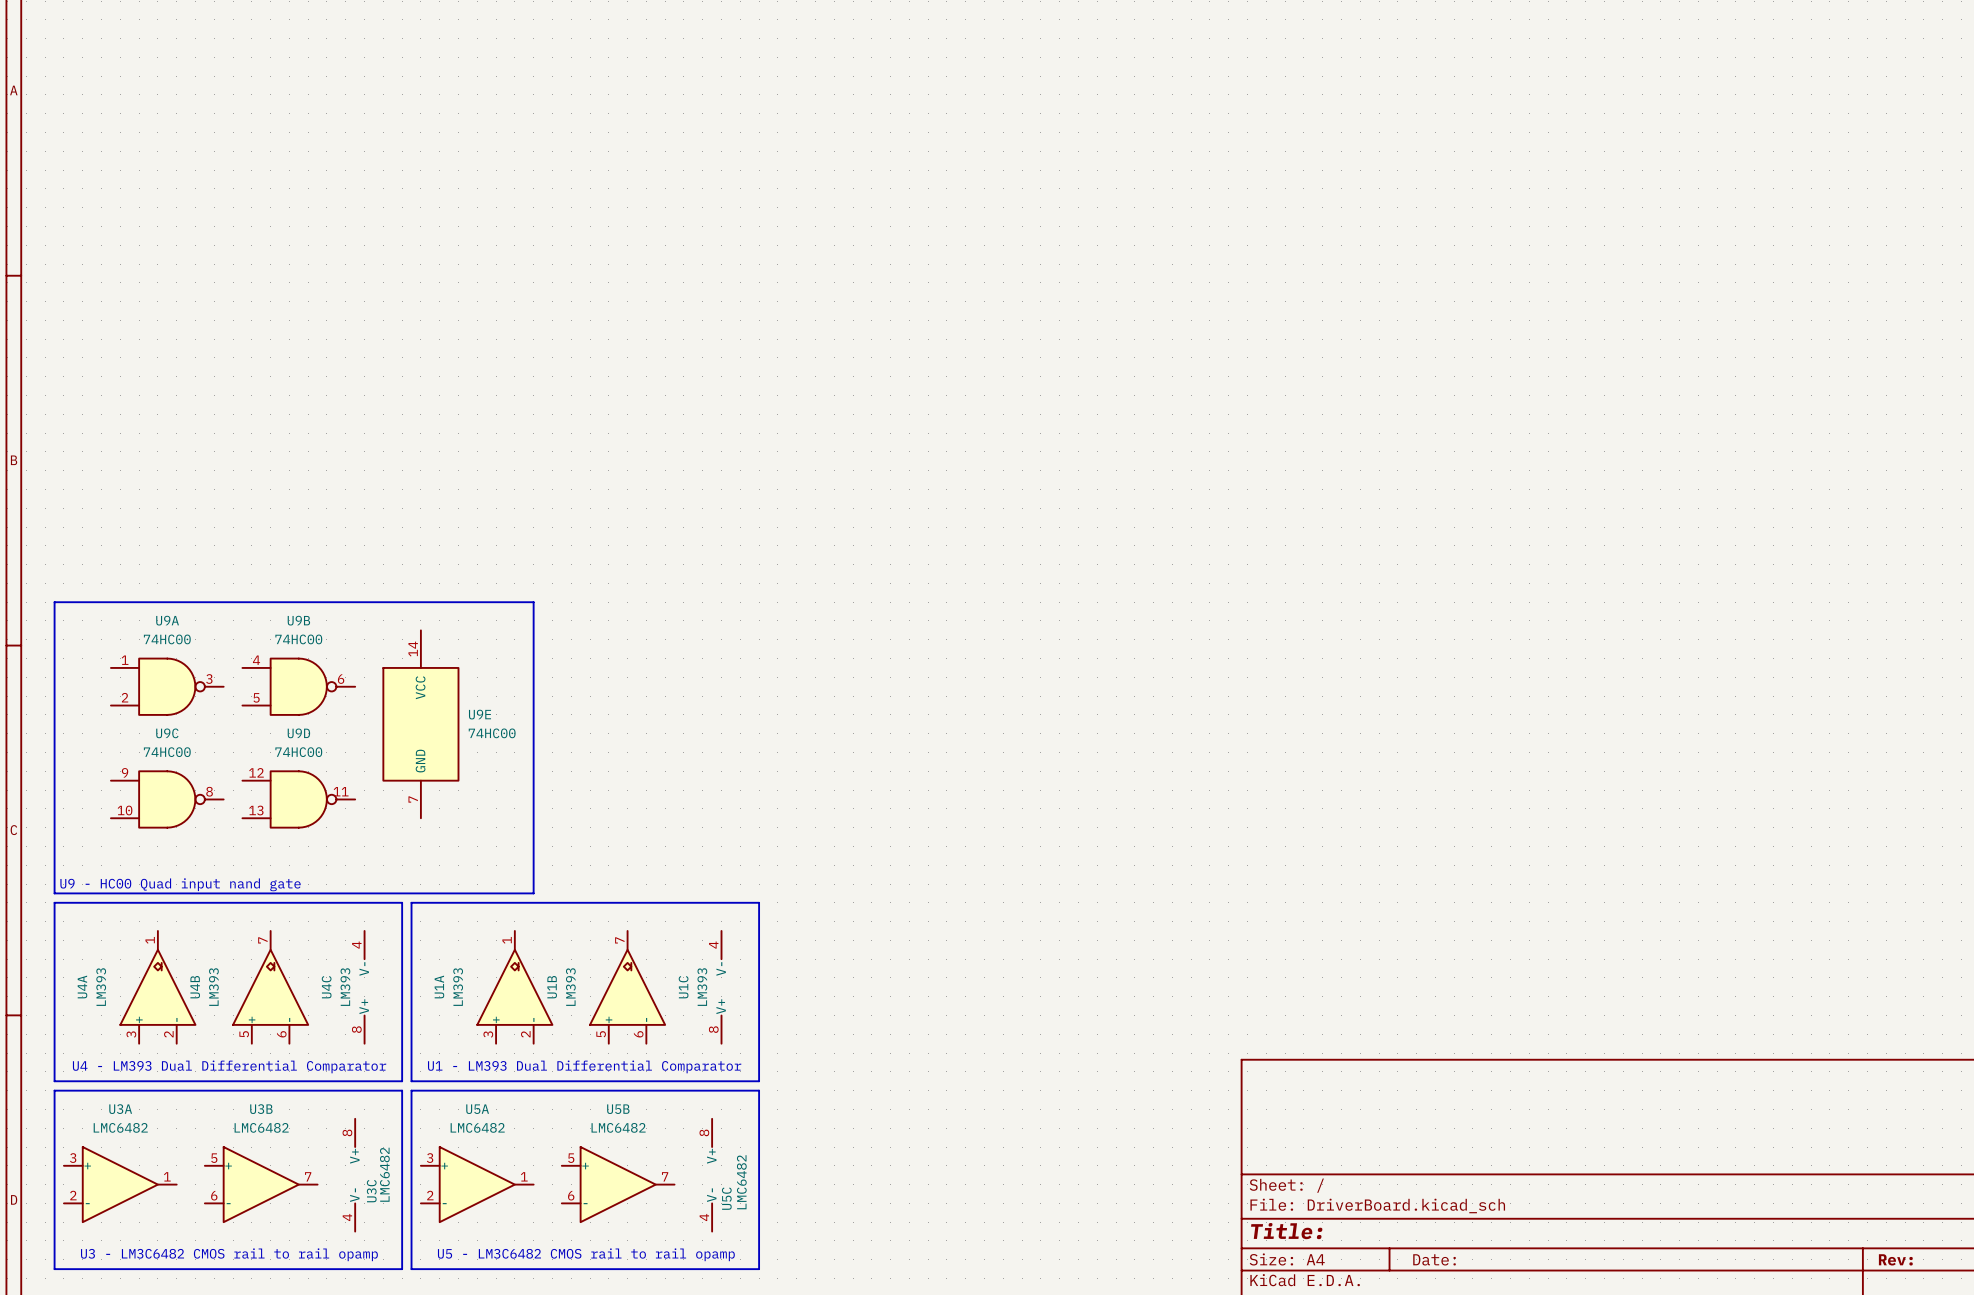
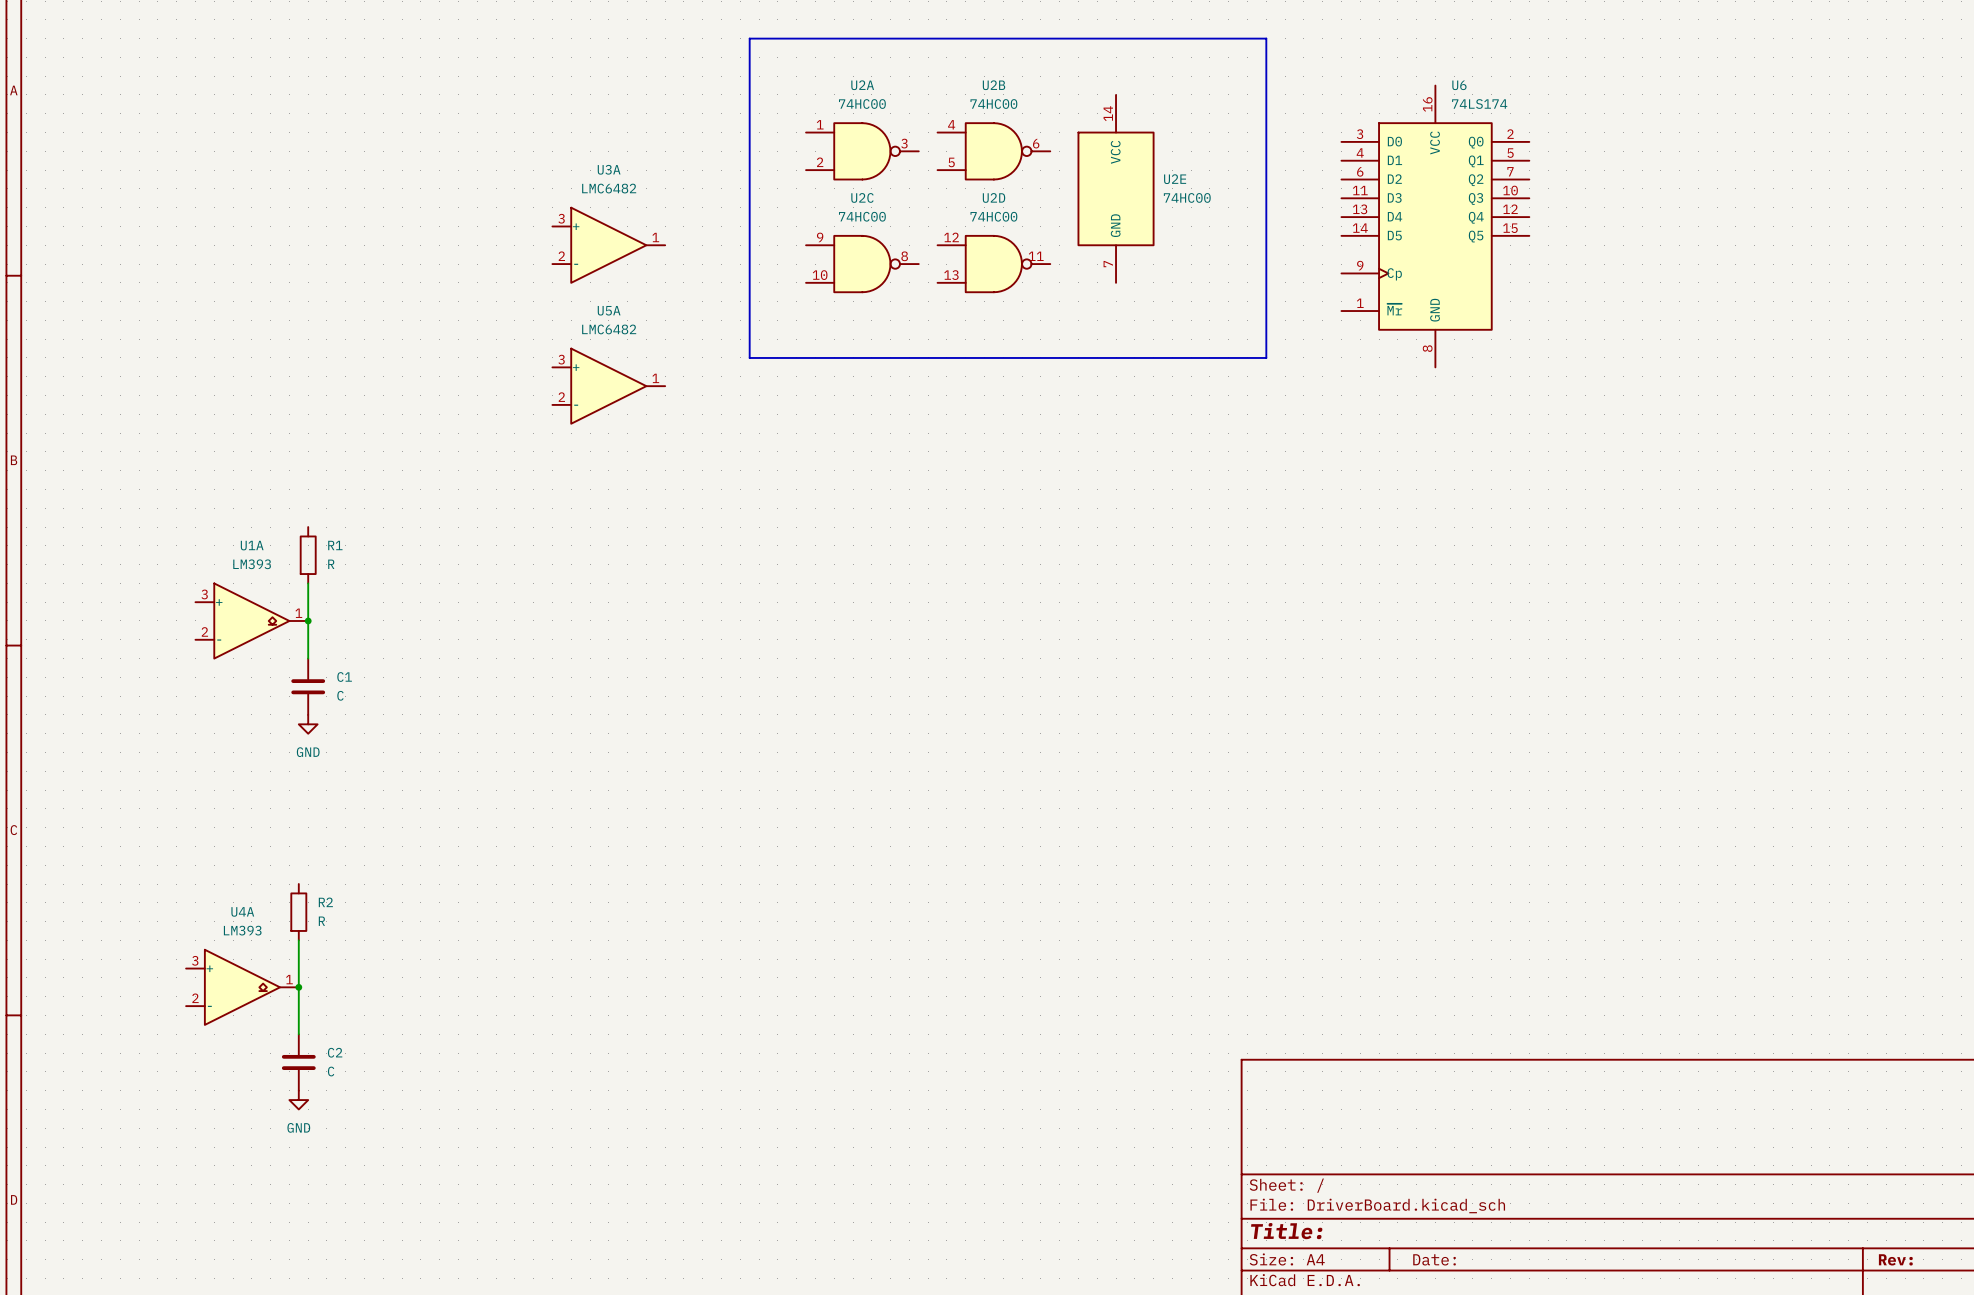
line: none -> (749, 38) (1266, 38) (1266, 357) (749, 357) (749, 38)
U2A: none -> 74HC00 (862, 151)
U2B: none -> 74HC00 (993, 151)
U2E: none -> 74HC00 (1116, 188)
U6: none -> 74LS174 (1435, 226)
U2C: none -> 74HC00 (862, 264)
U2D: none -> 74HC00 (993, 264)
R1: none -> R (308, 555)
wire: none -> (308, 583) (308, 658)
line: (54, 602) (54, 893) (533, 893) (533, 602) (54, 602) -> none
junction: none -> (308, 620)
U9A: 74HC00 (167, 686) -> none
U9B: 74HC00 (298, 686) -> none
C1: none -> C (308, 686)
power symbol: none -> GND (308, 724)
U9E: 74HC00 (420, 724) -> none
U9C: 74HC00 (167, 799) -> none
U9D: 74HC00 (298, 799) -> none
text: U9 - HC00 Quad input nand gate (180, 884) -> none
line: (54, 902) (402, 902) (402, 1081) (54, 1081) (54, 902) -> none
line: (411, 902) (759, 902) (759, 1081) (411, 1081) (411, 902) -> none
R2: none -> R (298, 912)
wire: none -> (298, 940) (298, 1034)
U4A rotation: 0° (157, 987) -> 90° clockwise (242, 987)
U4A position: (157, 987) -> (242, 987)
U4B: LM393 (270, 987) -> none
junction: none -> (298, 987)
U4C: LM393 (364, 987) -> none
U1A rotation: 0° (514, 987) -> 90° clockwise (251, 620)
U1A position: (514, 987) -> (251, 620)
U1B: LM393 (627, 987) -> none
U1C: LM393 (721, 987) -> none
C2: none -> C (298, 1062)
text: U4 - LM393 Dual Differential Comparator (229, 1066) -> none
text: U1 - LM393 Dual Differential Comparator (584, 1066) -> none
line: (54, 1090) (54, 1269) (402, 1269) (402, 1090) (54, 1090) -> none
line: (411, 1090) (759, 1090) (759, 1269) (411, 1269) (411, 1090) -> none
power symbol: none -> GND (298, 1100)
U3C: LMC6482 (355, 1175) -> none
U5C: LMC6482 (712, 1175) -> none
U3A position: (120, 1184) -> (608, 245)
U3B: LMC6482 (261, 1184) -> none
U5A position: (477, 1184) -> (608, 386)
U5B: LMC6482 (618, 1184) -> none
text: U3 - LM3C6482 CMOS rail to rail opamp (229, 1254) -> none
text: U5 - LM3C6482 CMOS rail to rail opamp (586, 1254) -> none

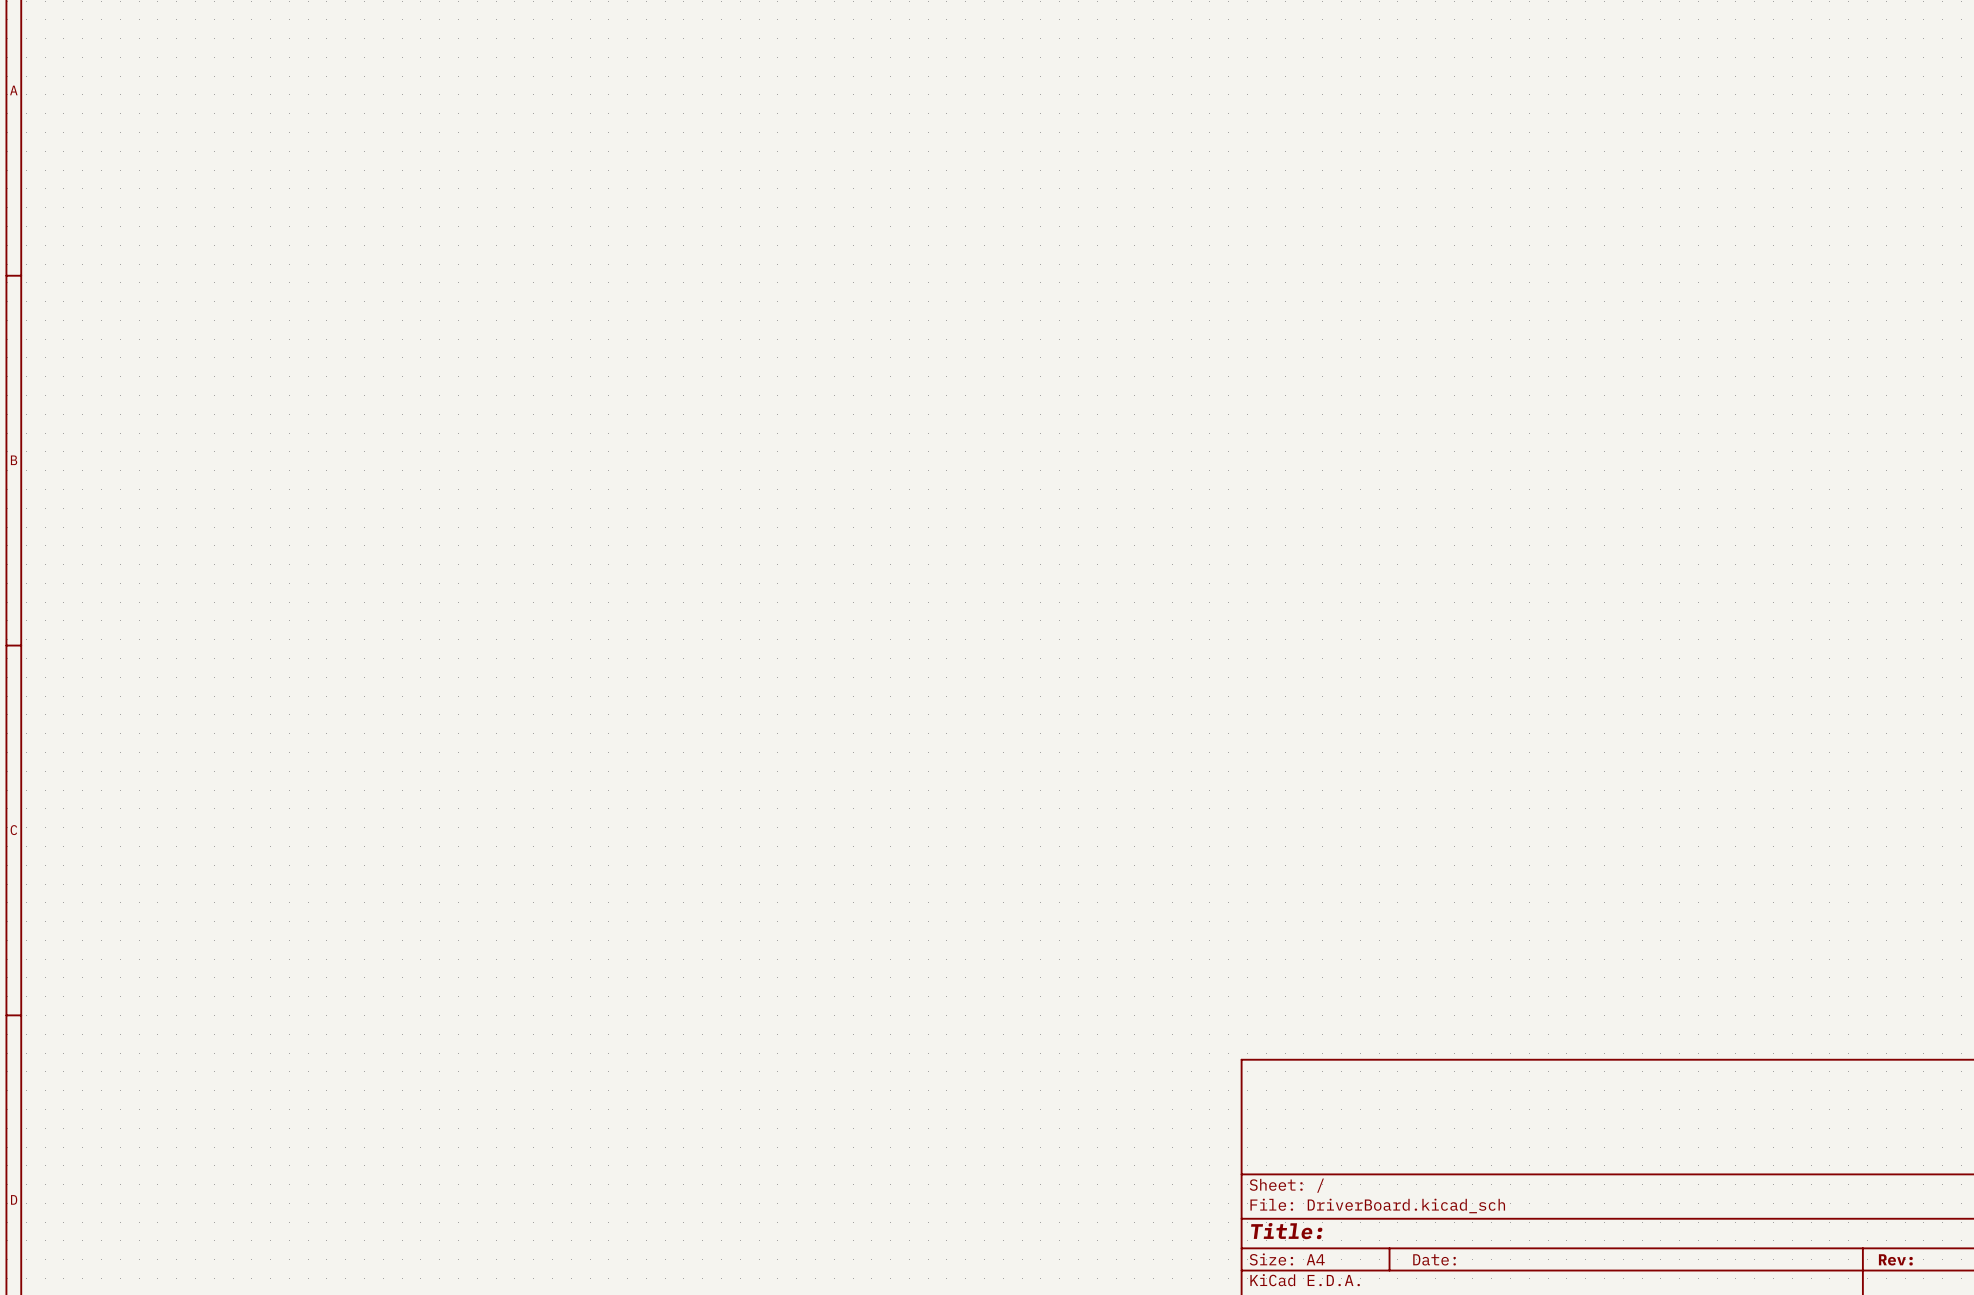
line: (749, 38) (1266, 38) (1266, 357) (749, 357) (749, 38) -> none
U2A: 74HC00 (862, 151) -> none
U2B: 74HC00 (993, 151) -> none
U2E: 74HC00 (1116, 188) -> none
U6: 74LS174 (1435, 226) -> none
U3A: LMC6482 (608, 245) -> none
U2C: 74HC00 (862, 264) -> none
U2D: 74HC00 (993, 264) -> none
U5A: LMC6482 (608, 386) -> none
R1: R (308, 555) -> none
wire: (308, 583) (308, 658) -> none
U1A: LM393 (251, 620) -> none
junction: (308, 620) -> none
C1: C (308, 686) -> none
power symbol: GND (308, 724) -> none
R2: R (298, 912) -> none
wire: (298, 940) (298, 1034) -> none
U4A: LM393 (242, 987) -> none
junction: (298, 987) -> none
C2: C (298, 1062) -> none
power symbol: GND (298, 1100) -> none

